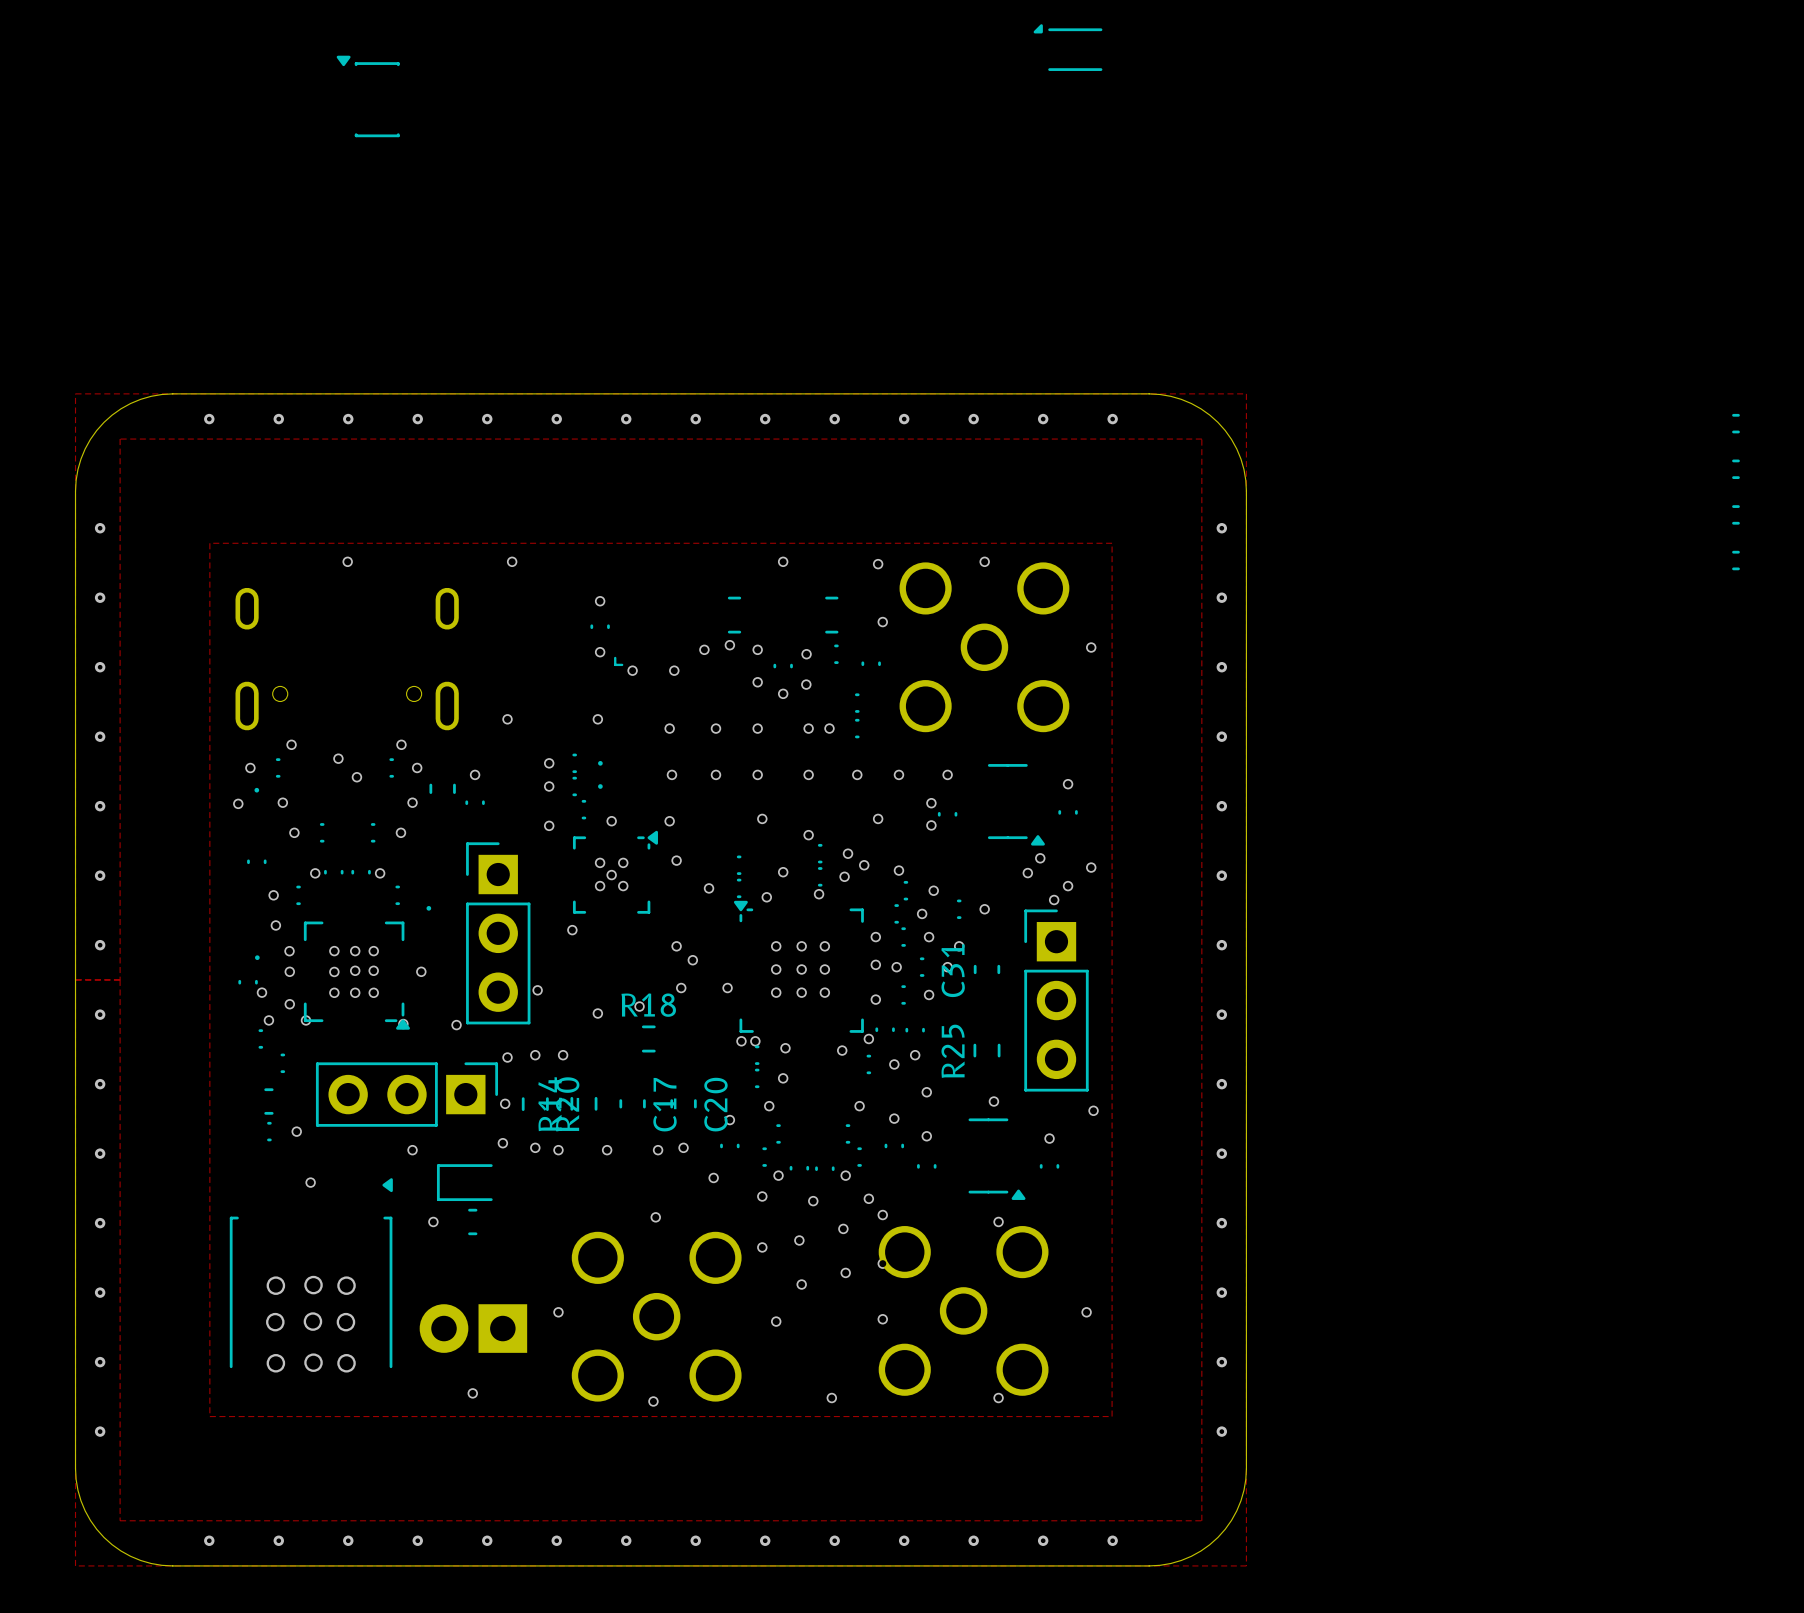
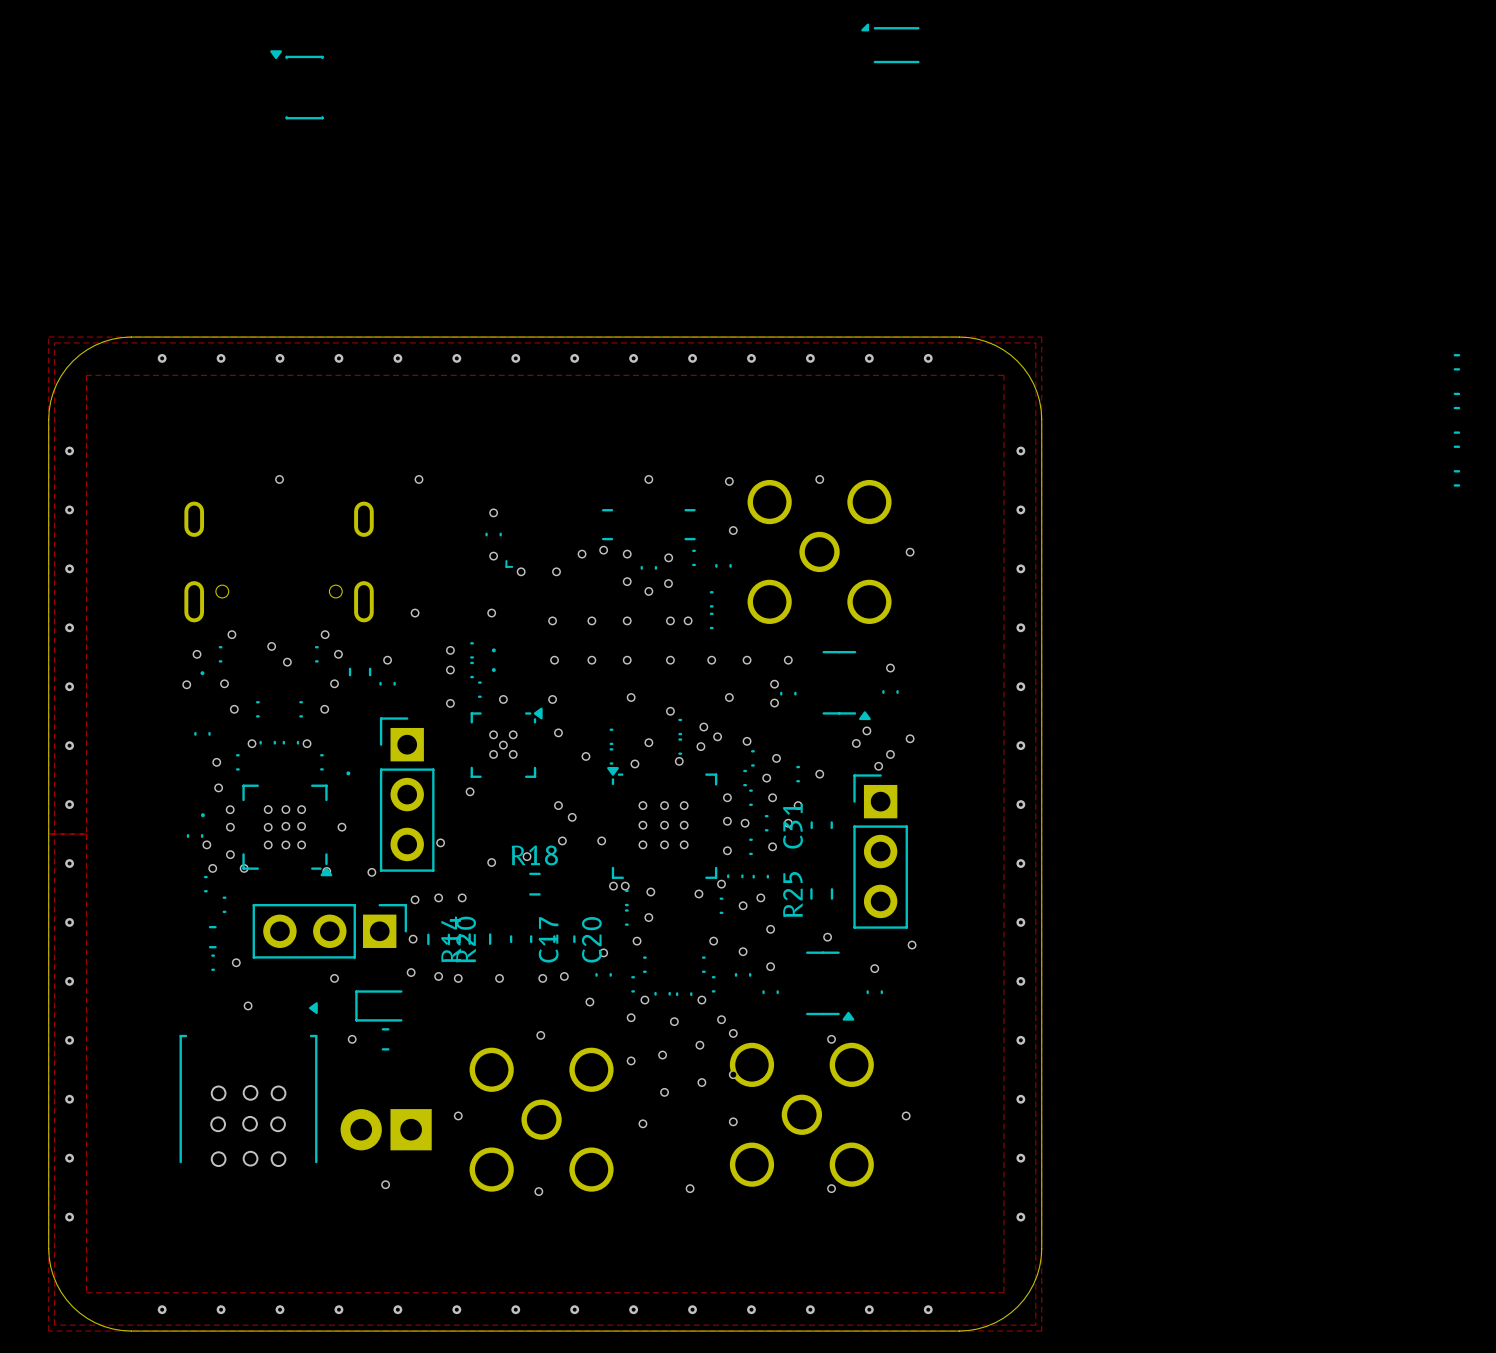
zone outline: (209, 543) (1112, 543) (1112, 1416) (209, 1416) (209, 543) -> (54, 342) (54, 1325) (1035, 1325) (1035, 342) (54, 342)

